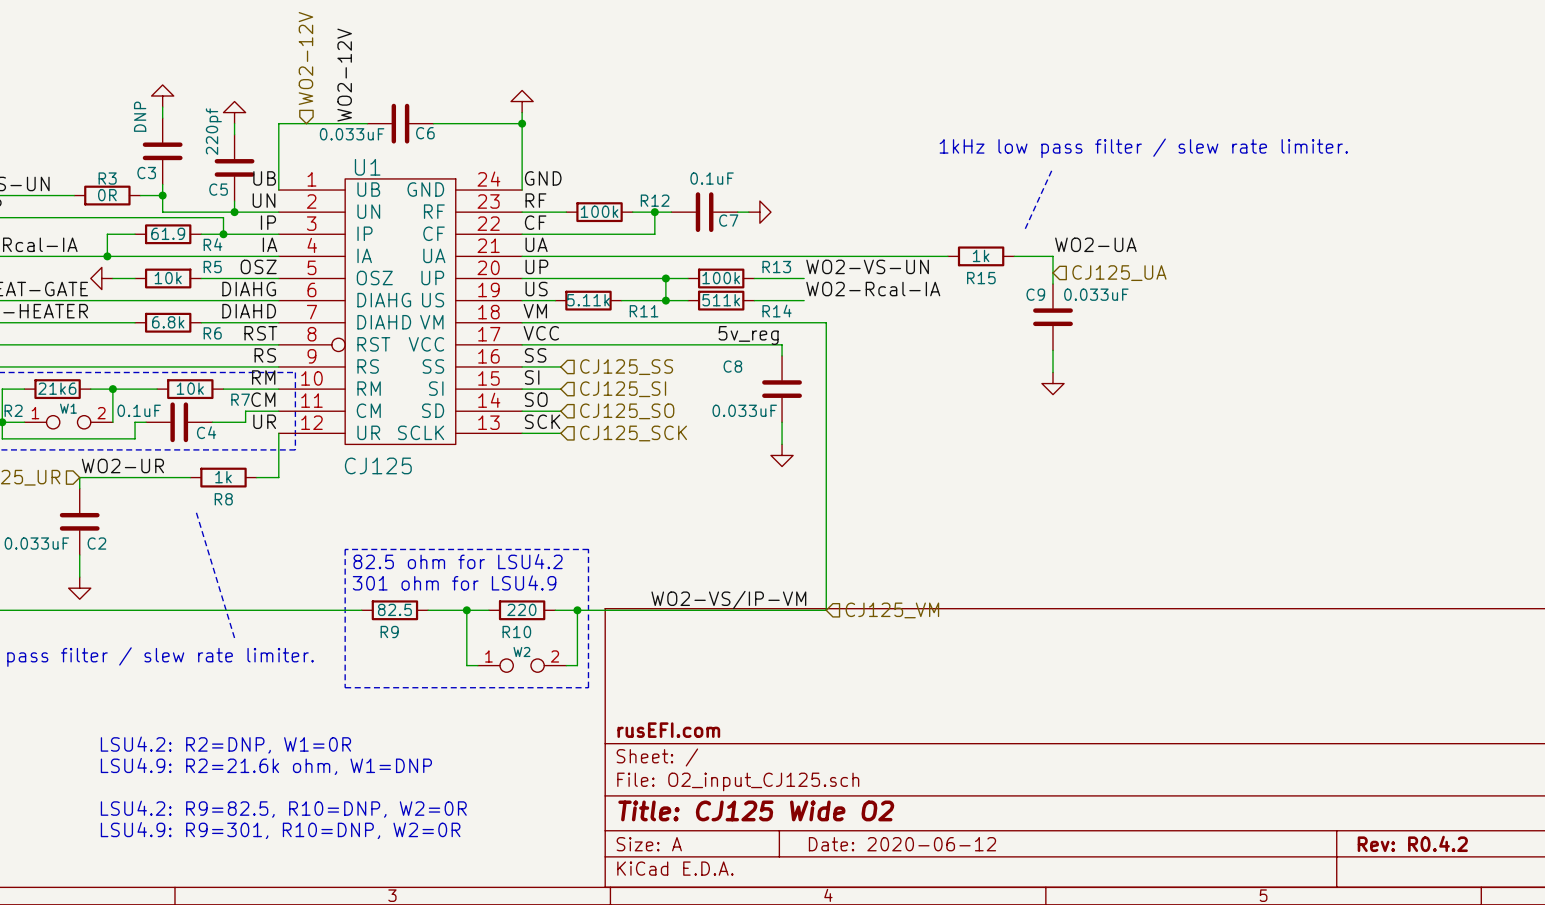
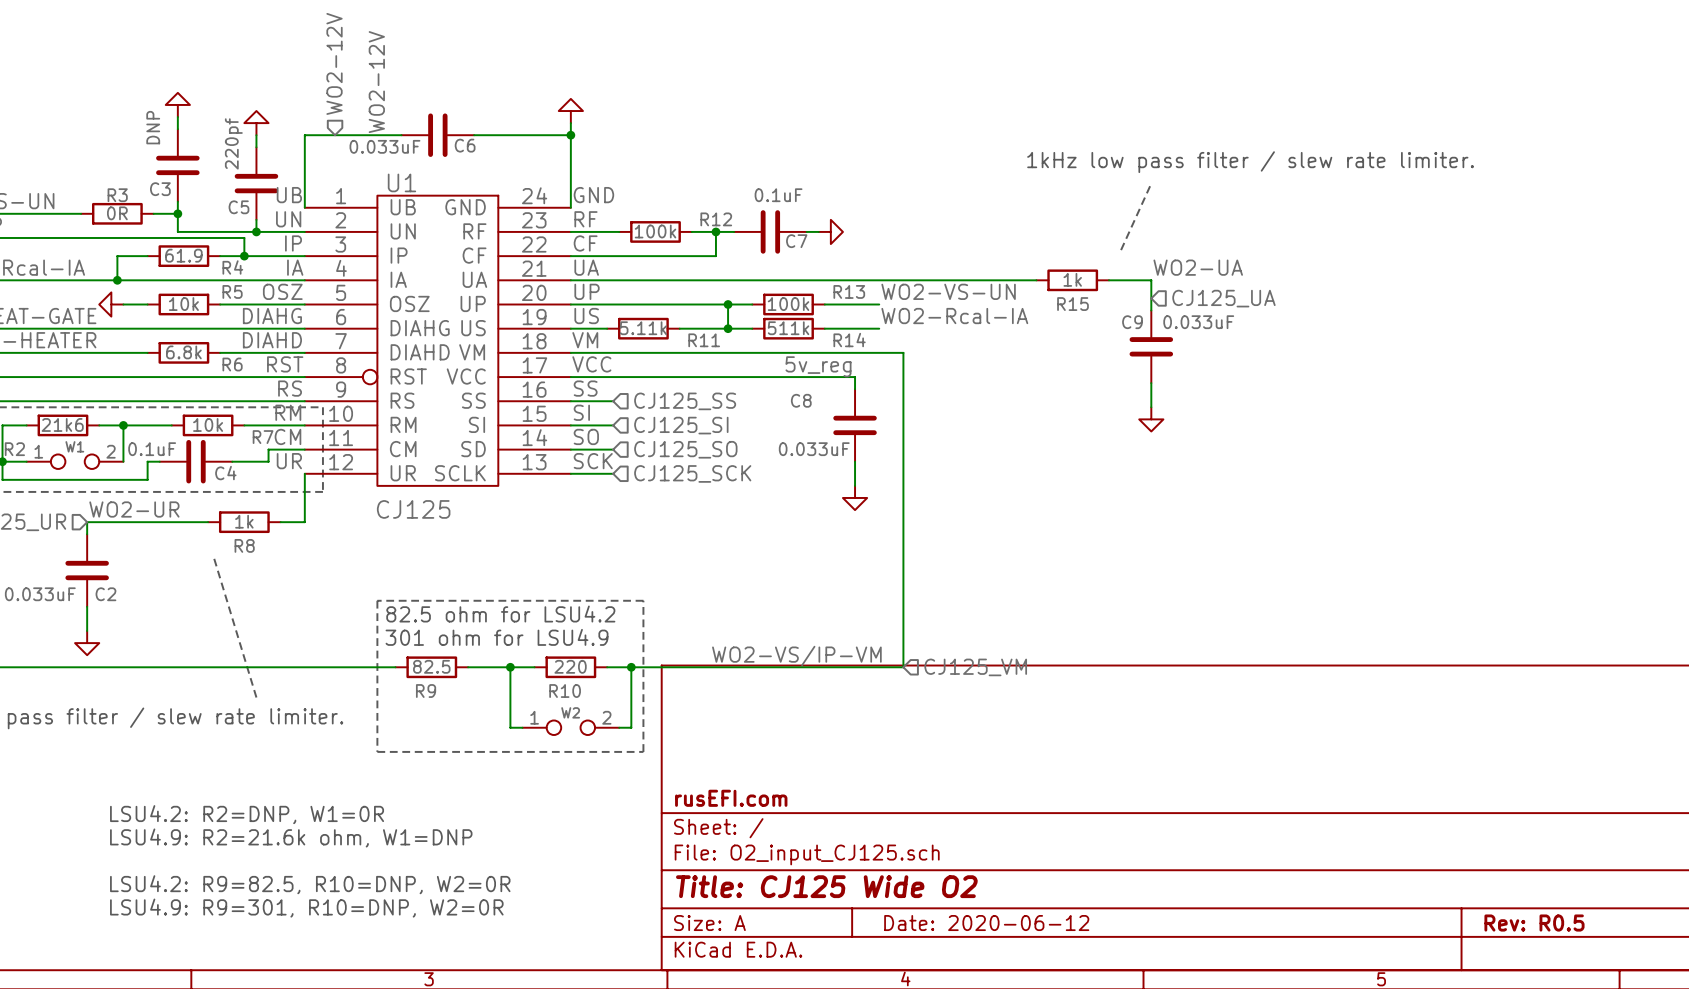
title block: Rev: R0.4.2 (1412, 843) -> Rev: R0.5 (1534, 923)

